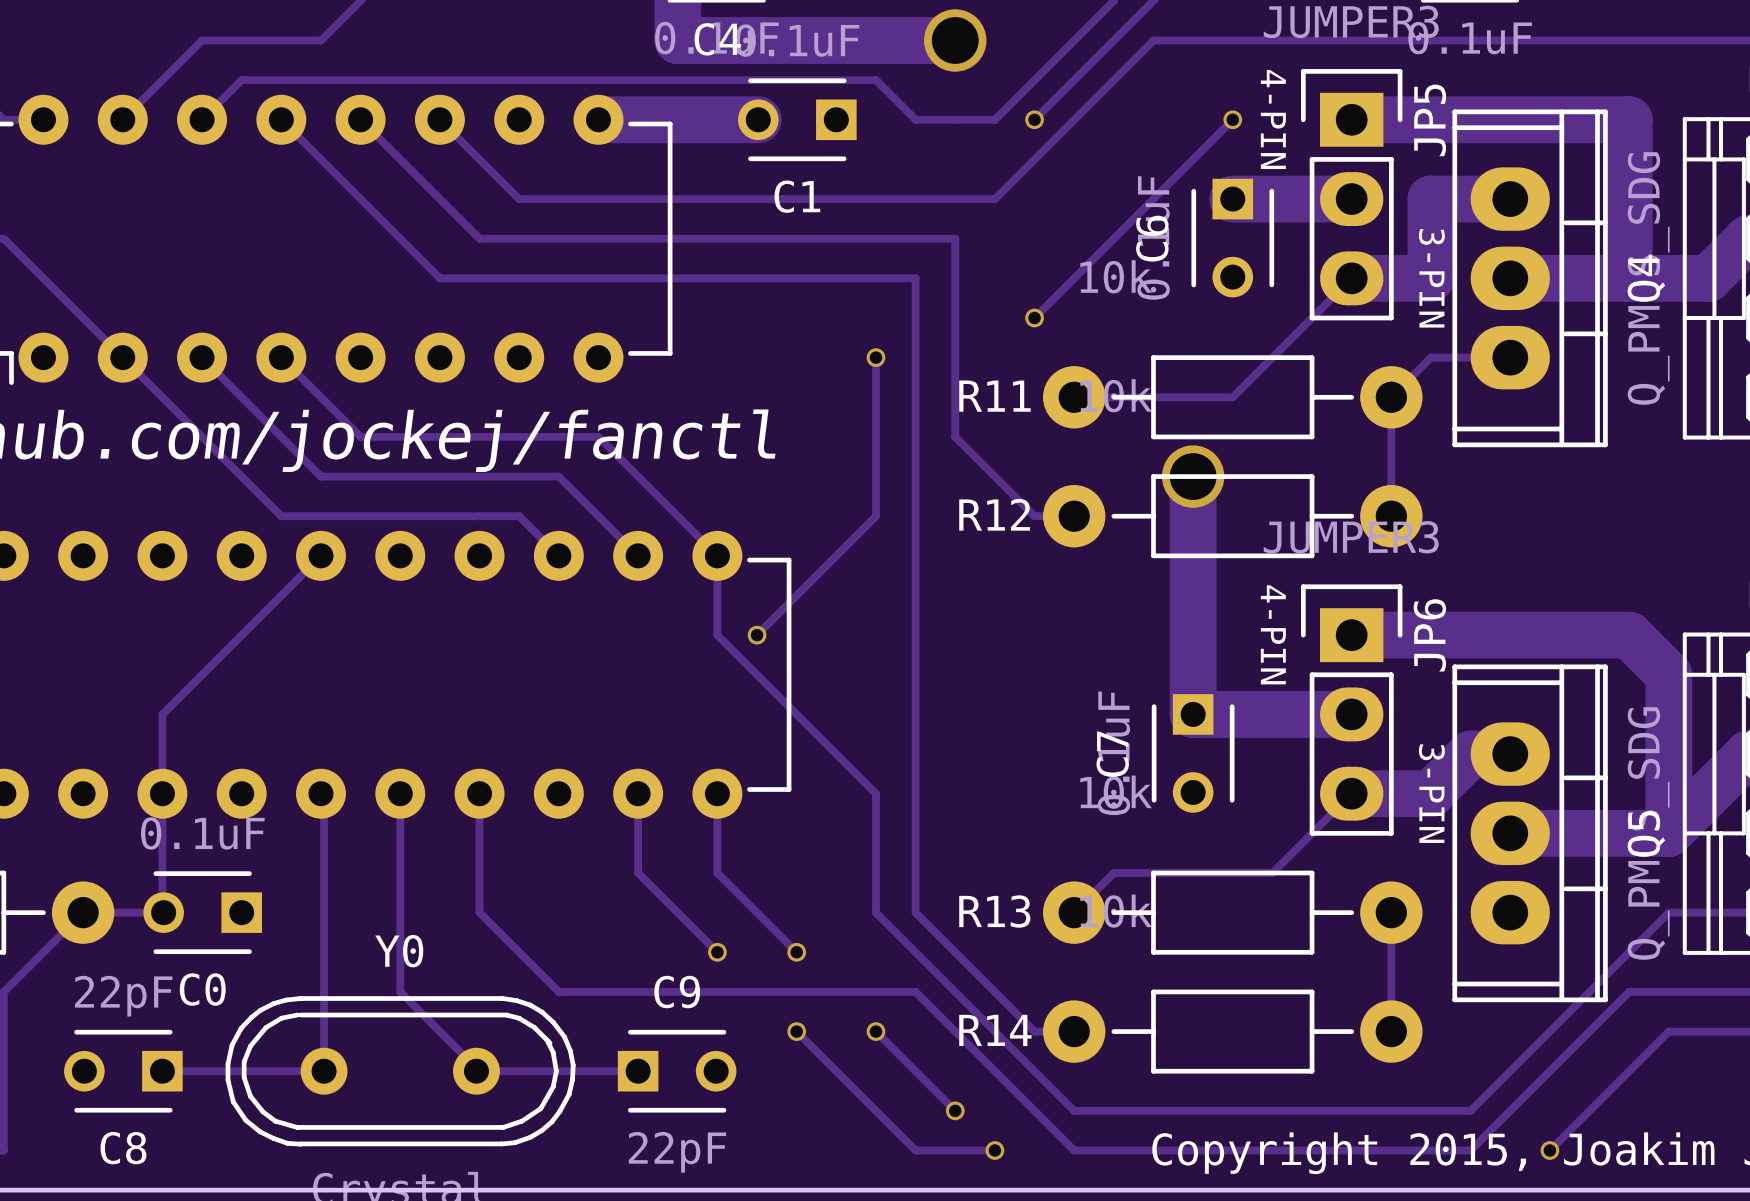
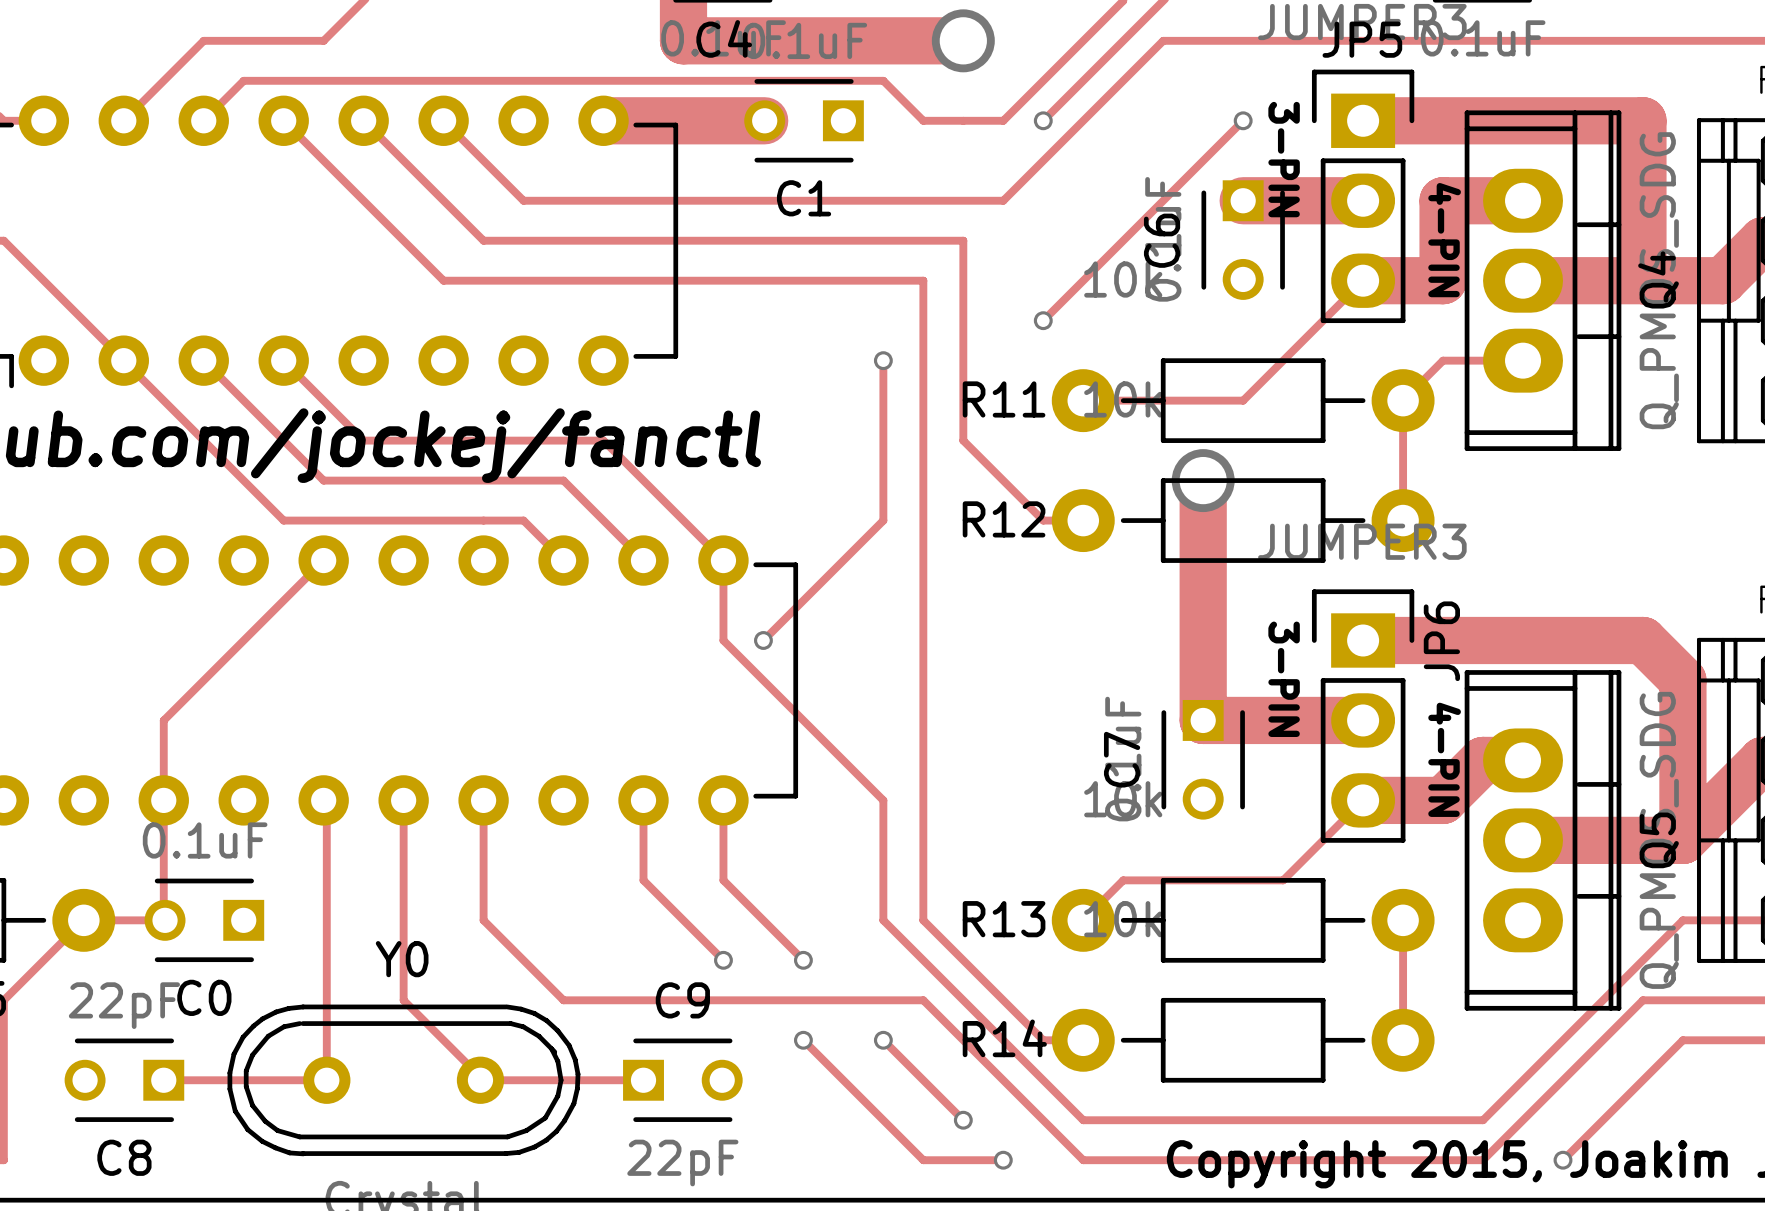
text position: 4-PIN (1273, 119) -> 4-PIN (1444, 240)
JP5 name rotation: 0° (1430, 120) -> 90° clockwise (1362, 39)
JP5 name position: JP5 (1430, 120) -> JP5 (1362, 39)
text position: 3-PIN (1431, 278) -> 3-PIN (1284, 159)
text position: 4-PIN (1273, 634) -> 4-PIN (1444, 759)
text position: 3-PIN (1431, 793) -> 3-PIN (1284, 679)

